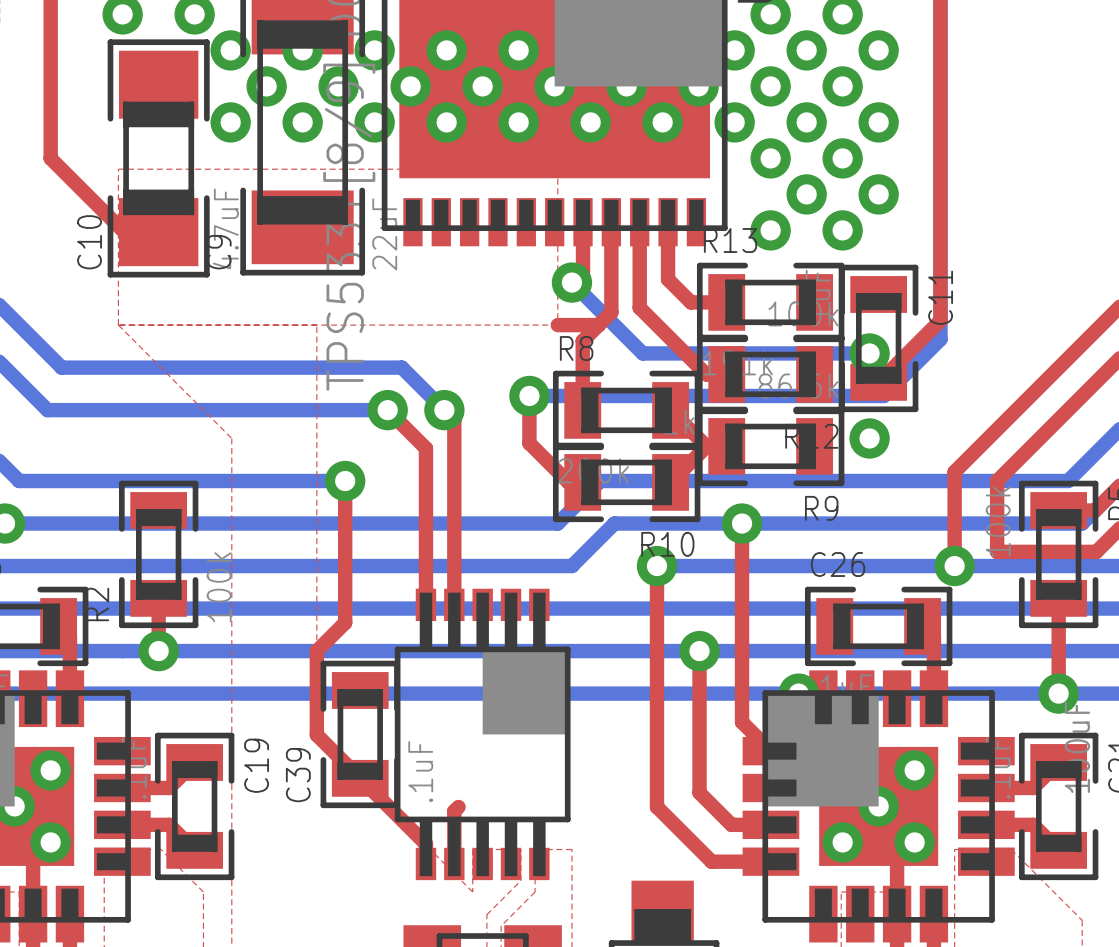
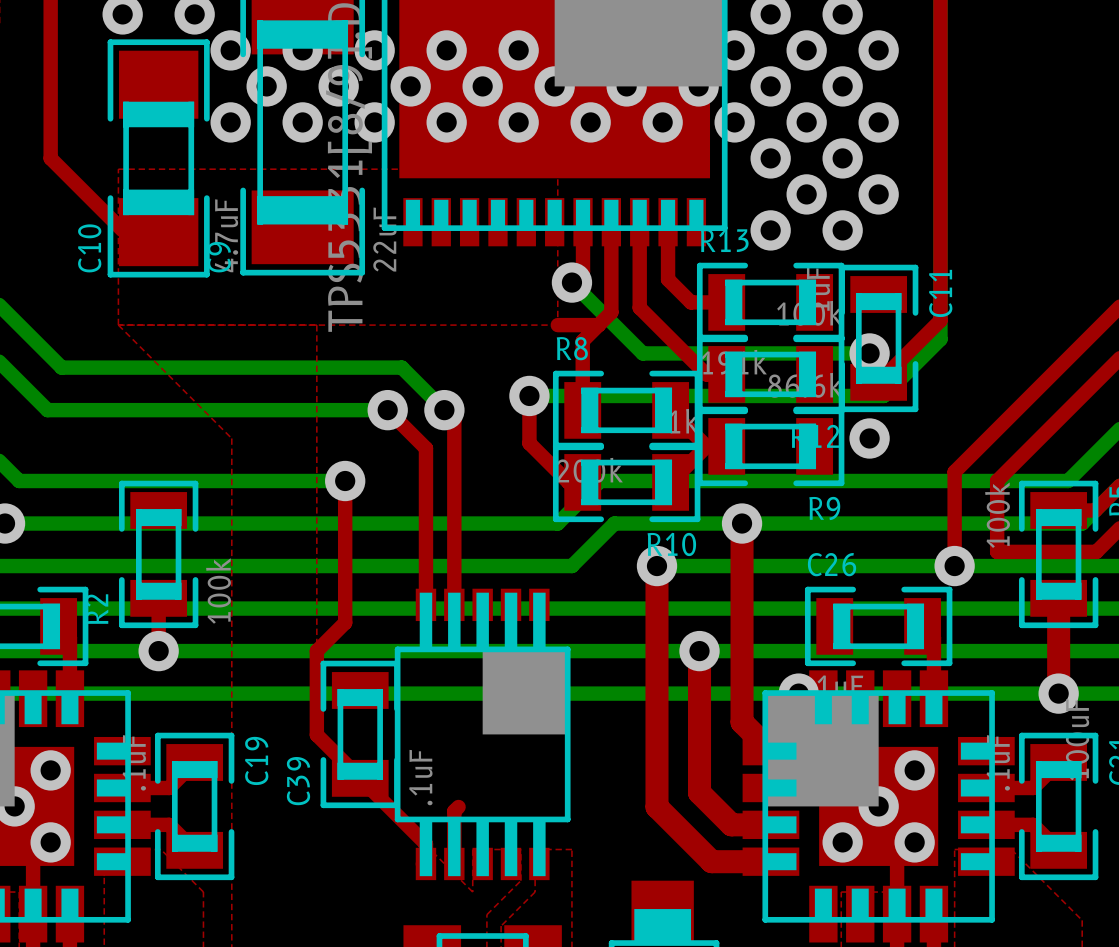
top track width: thin (742, 523) (742, 722) (770, 751) -> thick (742, 523) (742, 722) (770, 751)
top track width: thin (657, 566) (657, 806) (711, 861) (770, 861) -> thick (657, 566) (657, 806) (711, 861) (770, 861)
top track width: thin (1058, 598) (1058, 693) -> thick (1058, 598) (1058, 693)
top track width: thin (699, 651) (699, 792) (731, 824) (770, 824) -> thick (699, 651) (699, 792) (731, 824) (770, 824)

